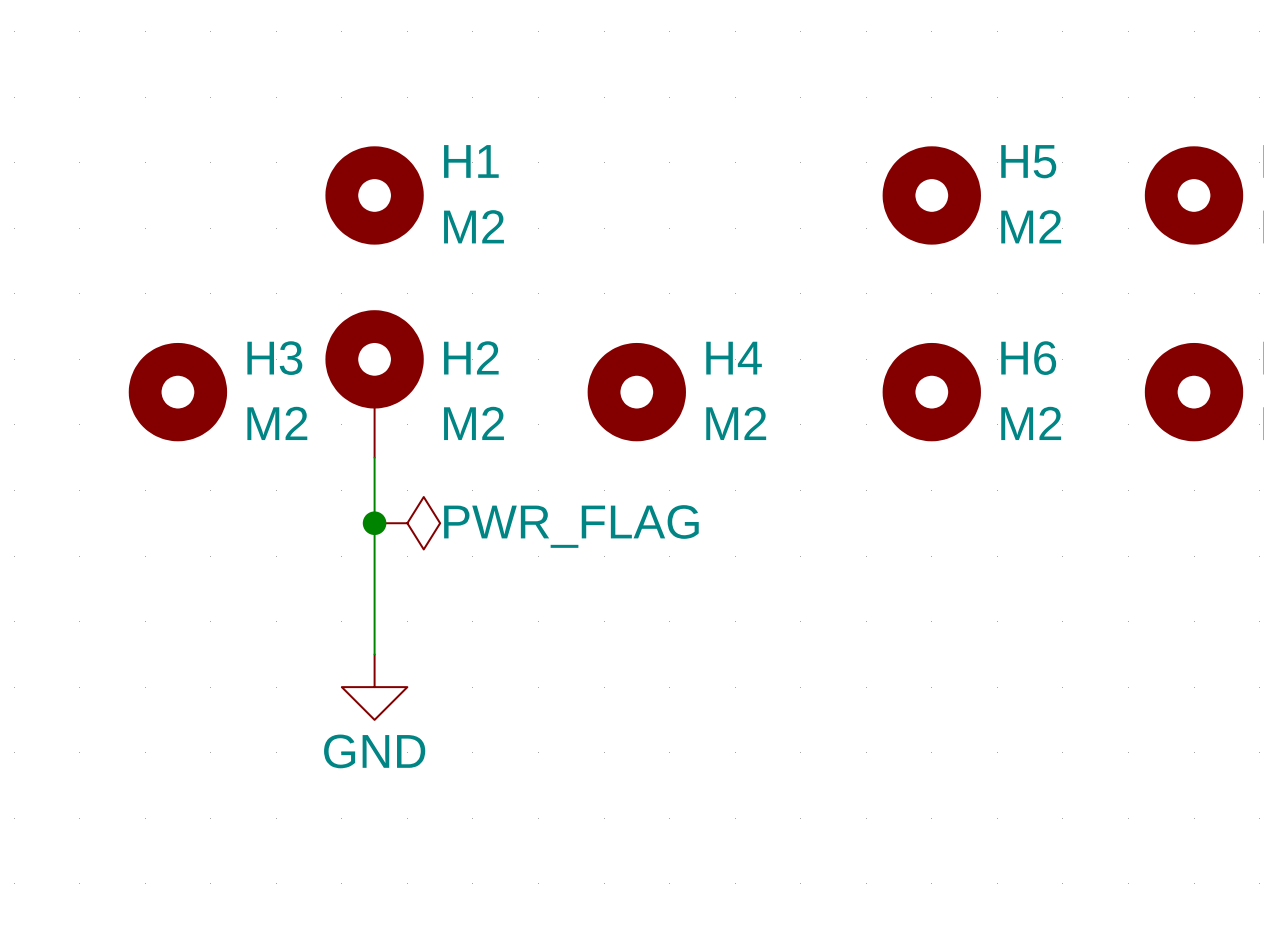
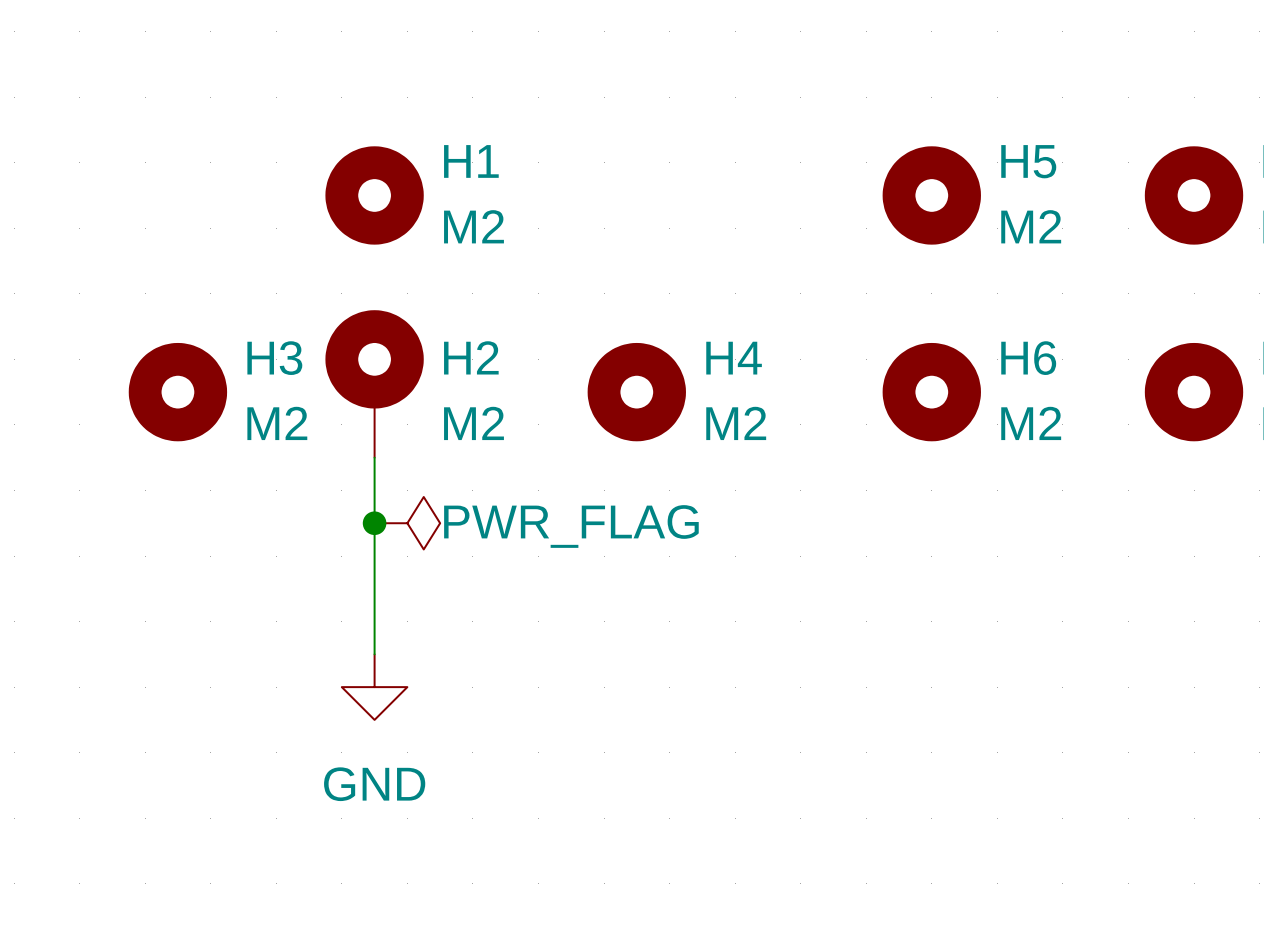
power symbol text position: GND (374, 751) -> GND (374, 784)

